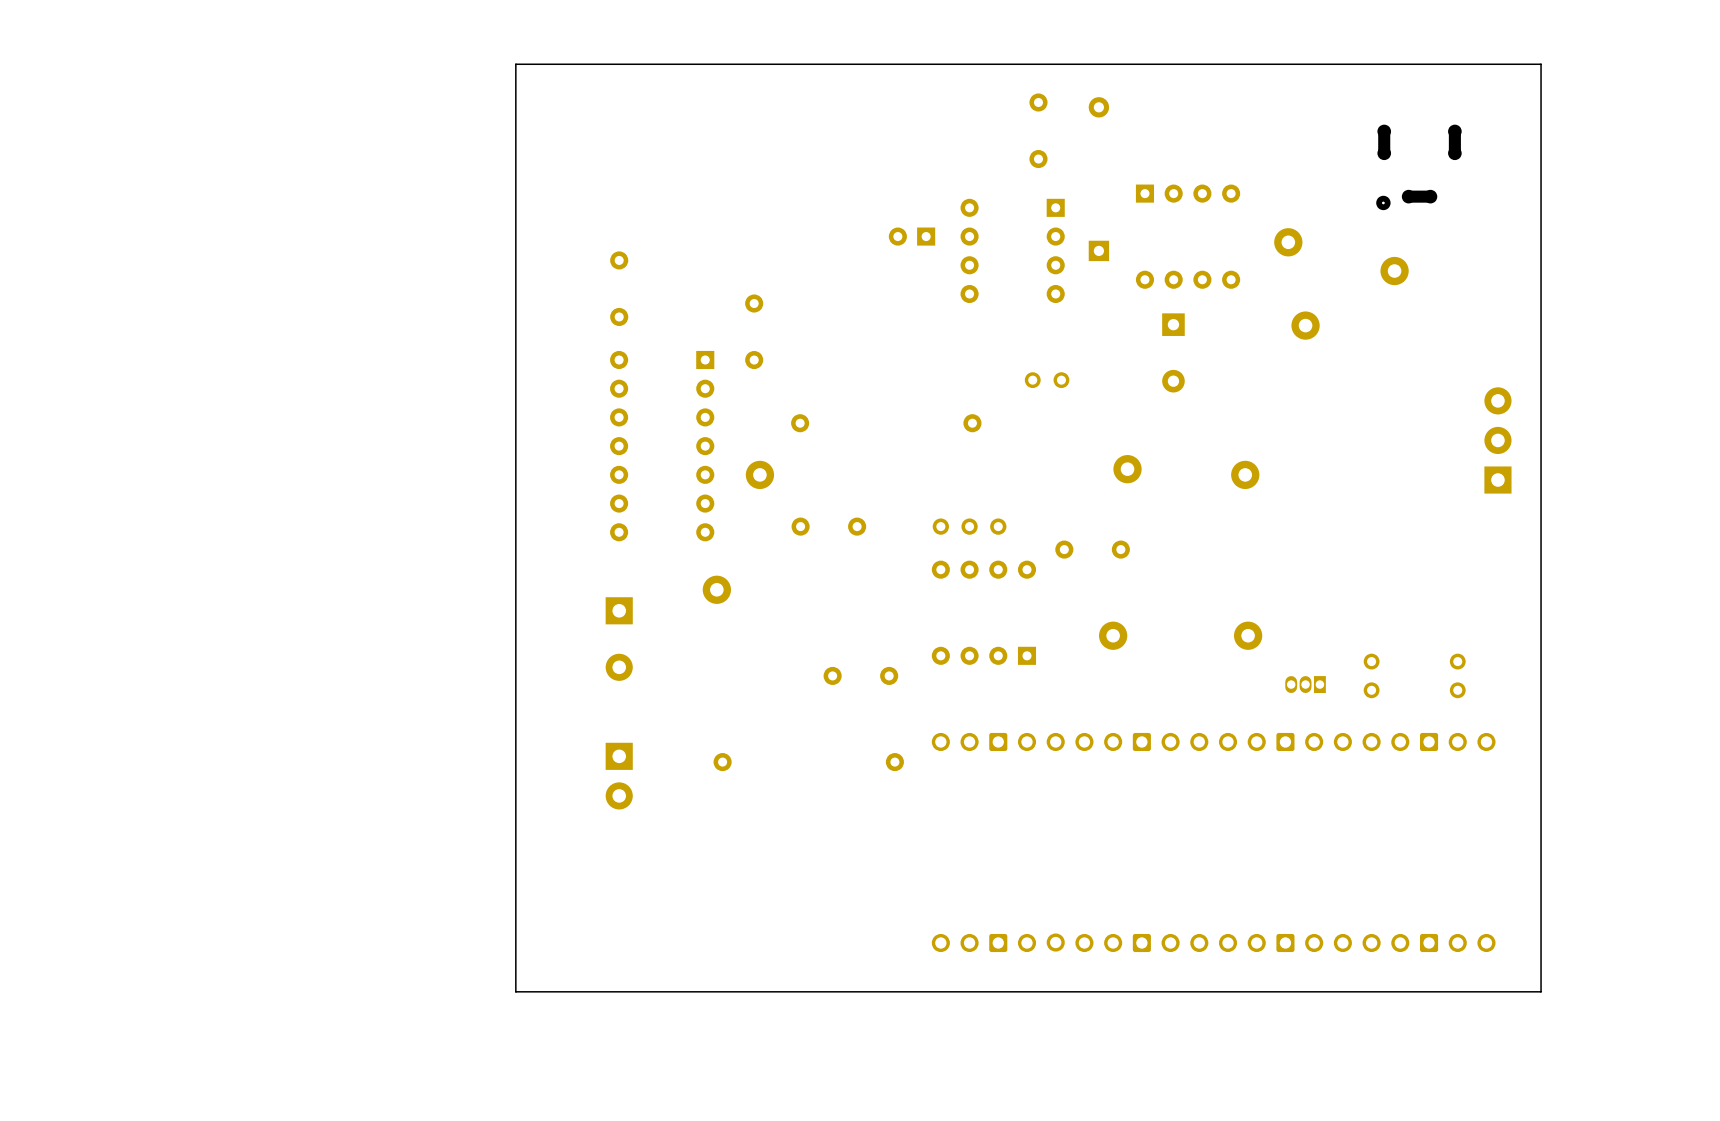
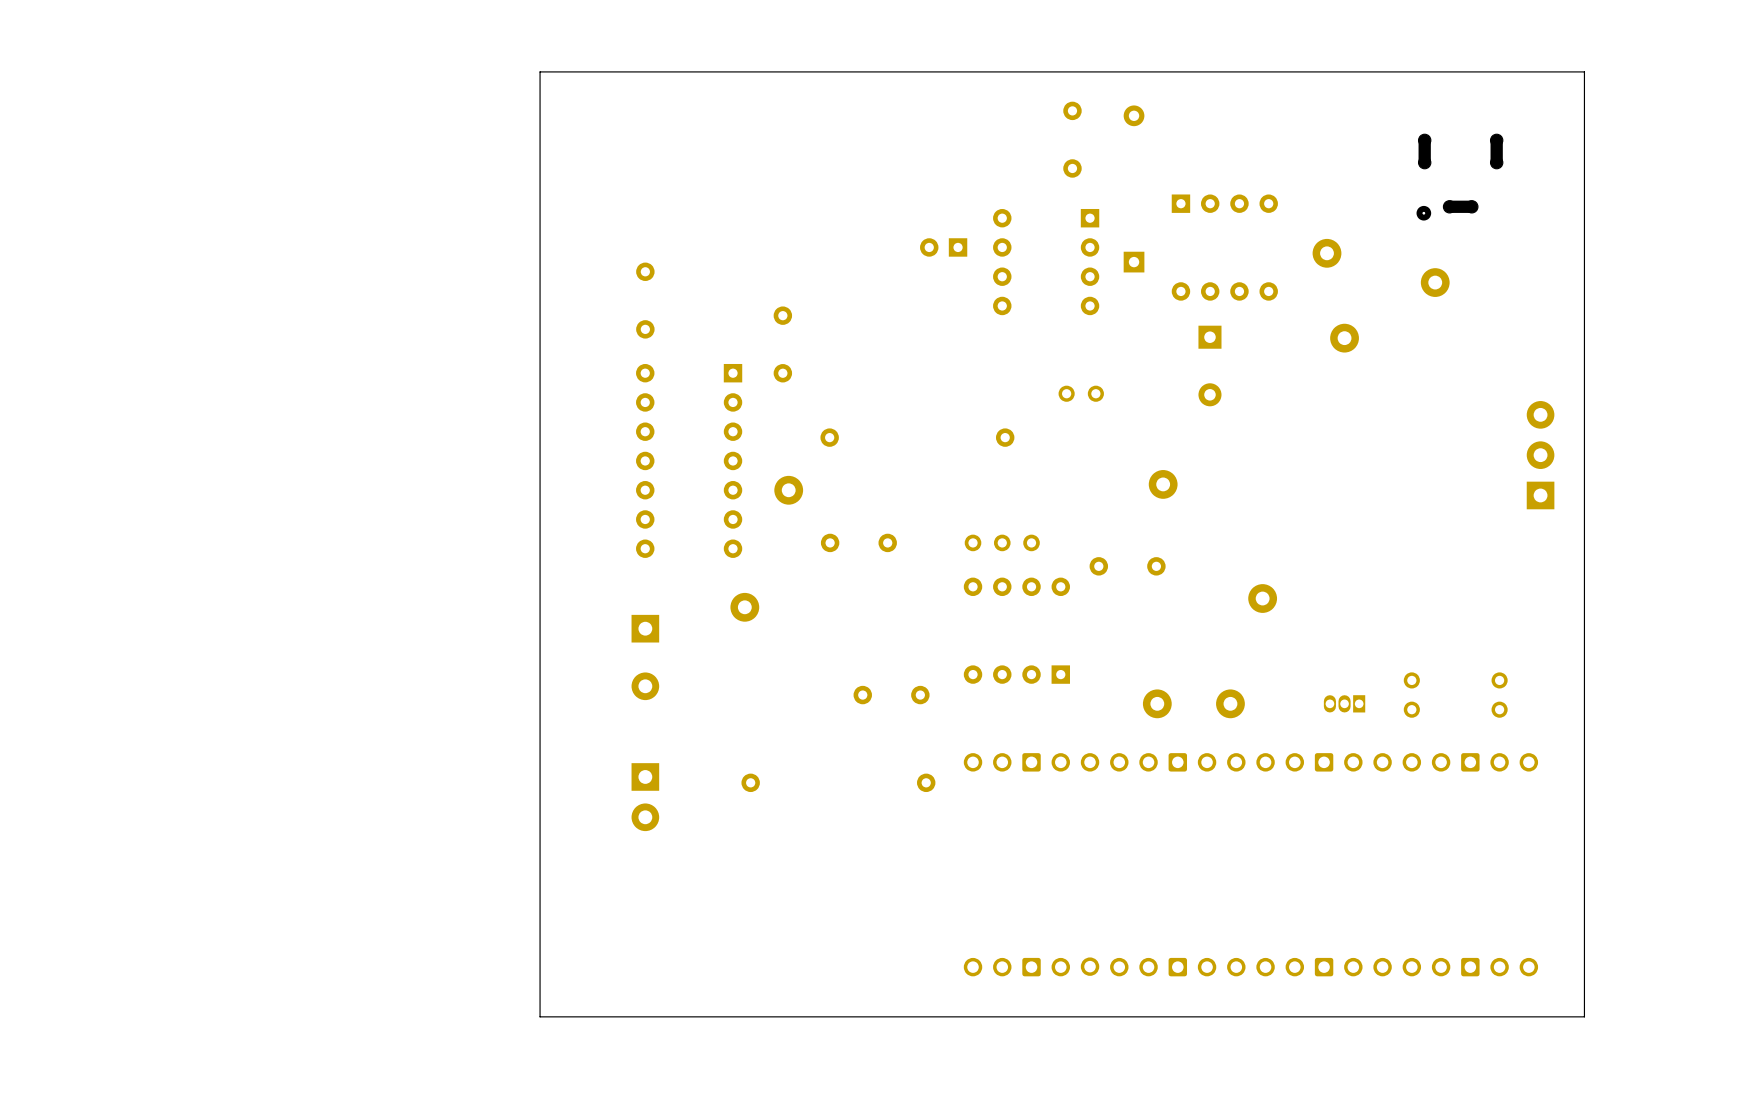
part: (1245, 474) -> none
part: none -> (1262, 598)
part: (1113, 635) -> none
part: (1248, 635) -> none
part: none -> (1157, 703)
part: none -> (1230, 703)

